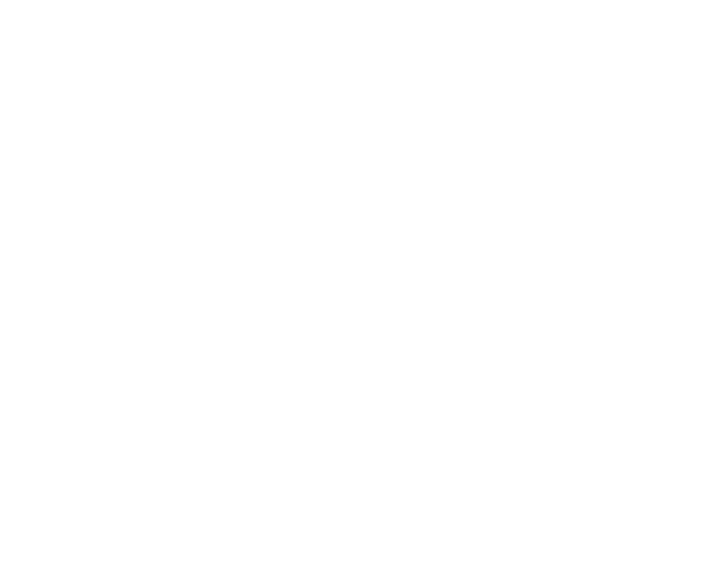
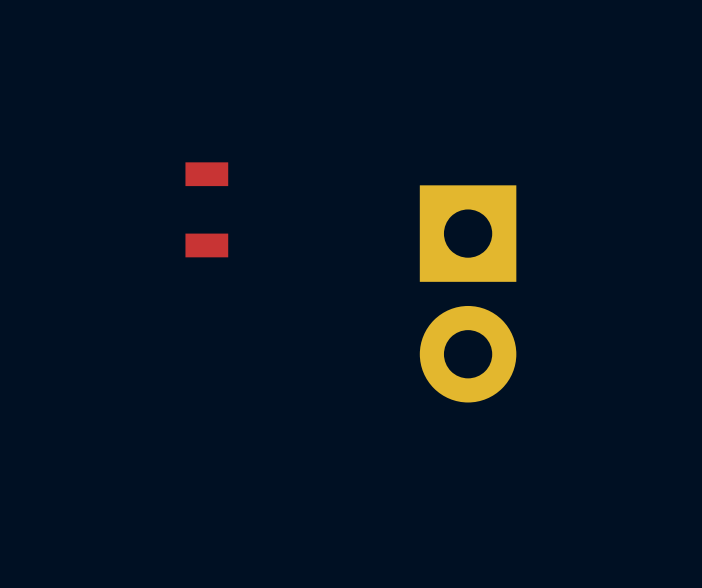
part: none -> (206, 209)
part: none -> (468, 293)

